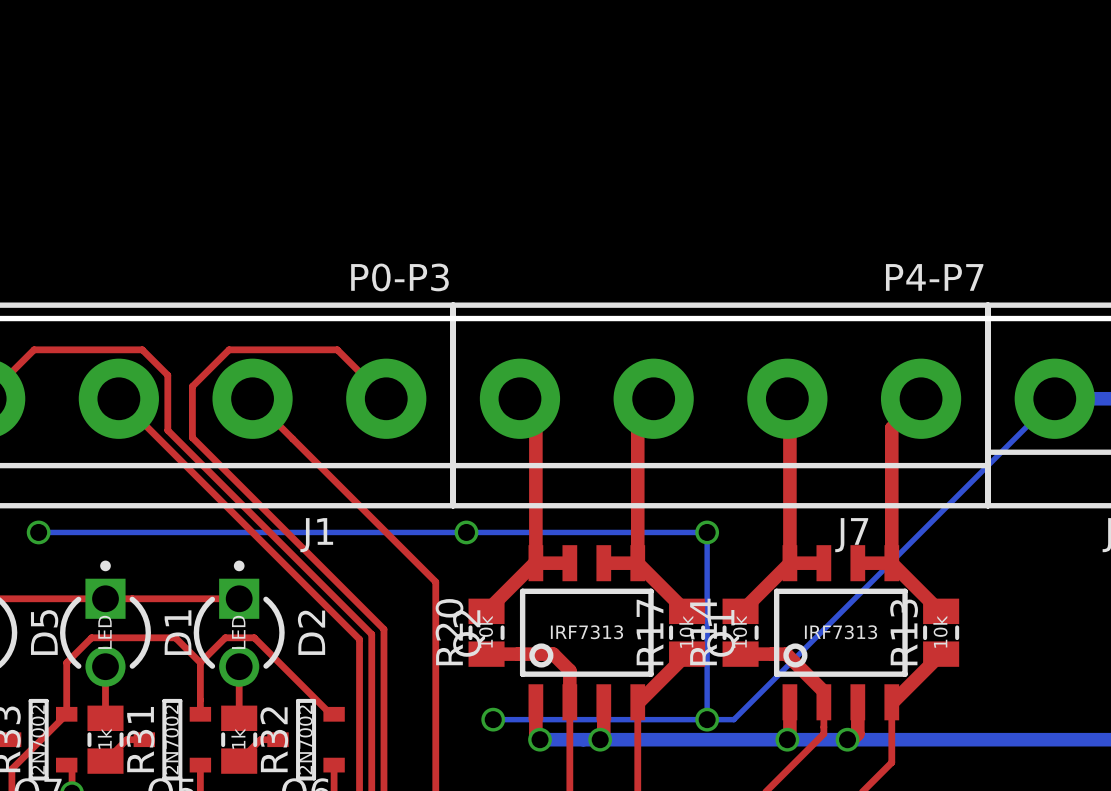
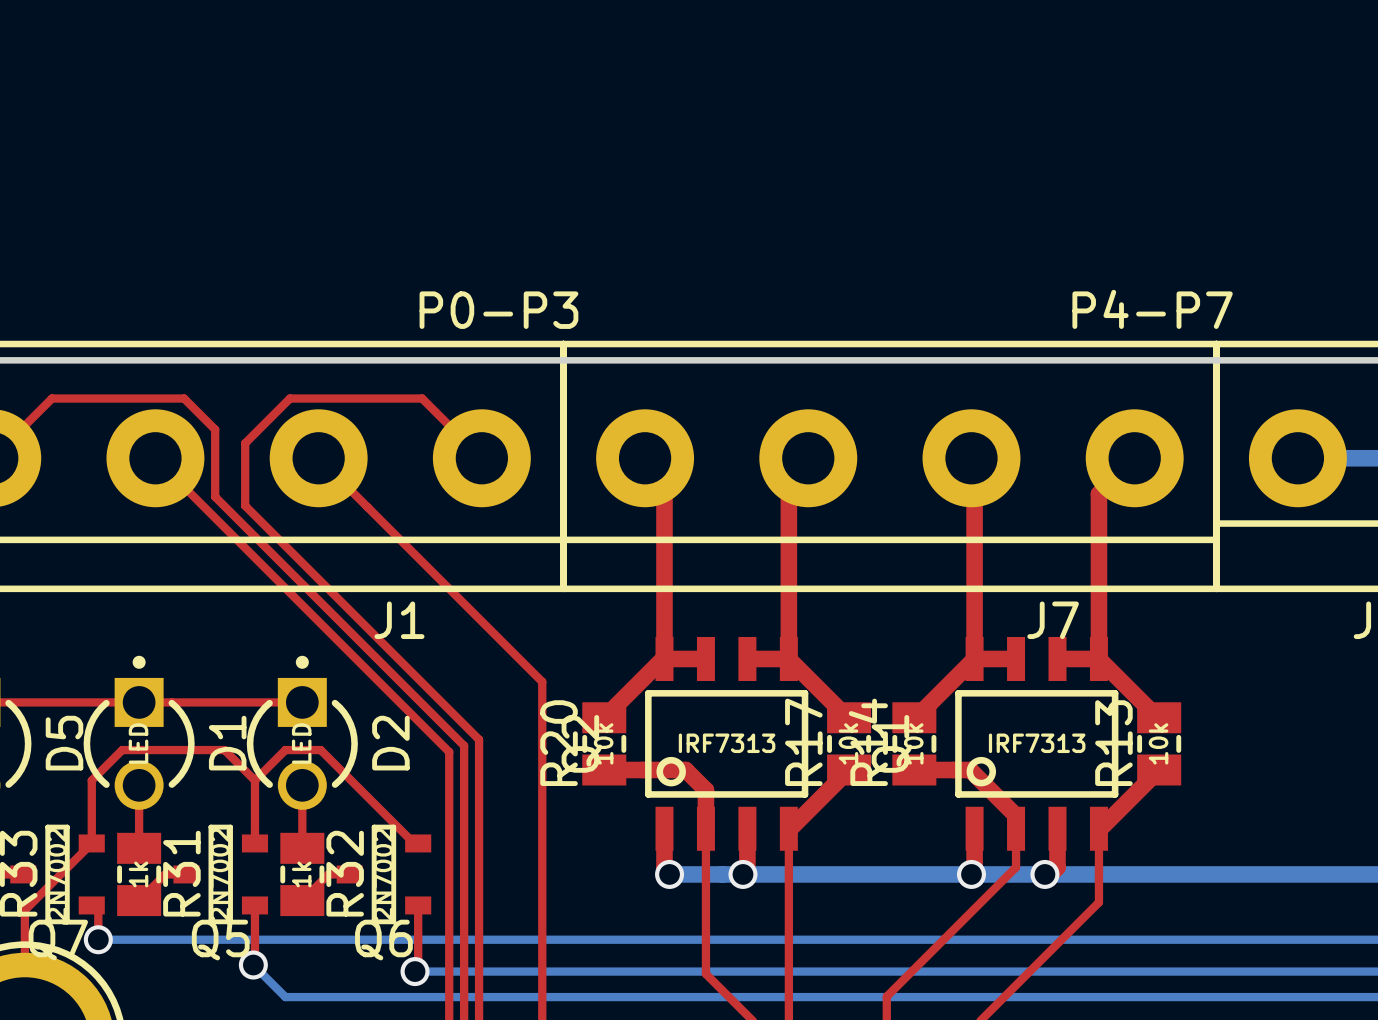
bottom track: (1054, 398) (733, 719) (493, 719) -> none
bottom track: (38, 532) (707, 532) (707, 719) -> none
via: (38, 532) -> none
via: (466, 532) -> none
via: (707, 532) -> none
via: (493, 719) -> none
via: (707, 719) -> none

